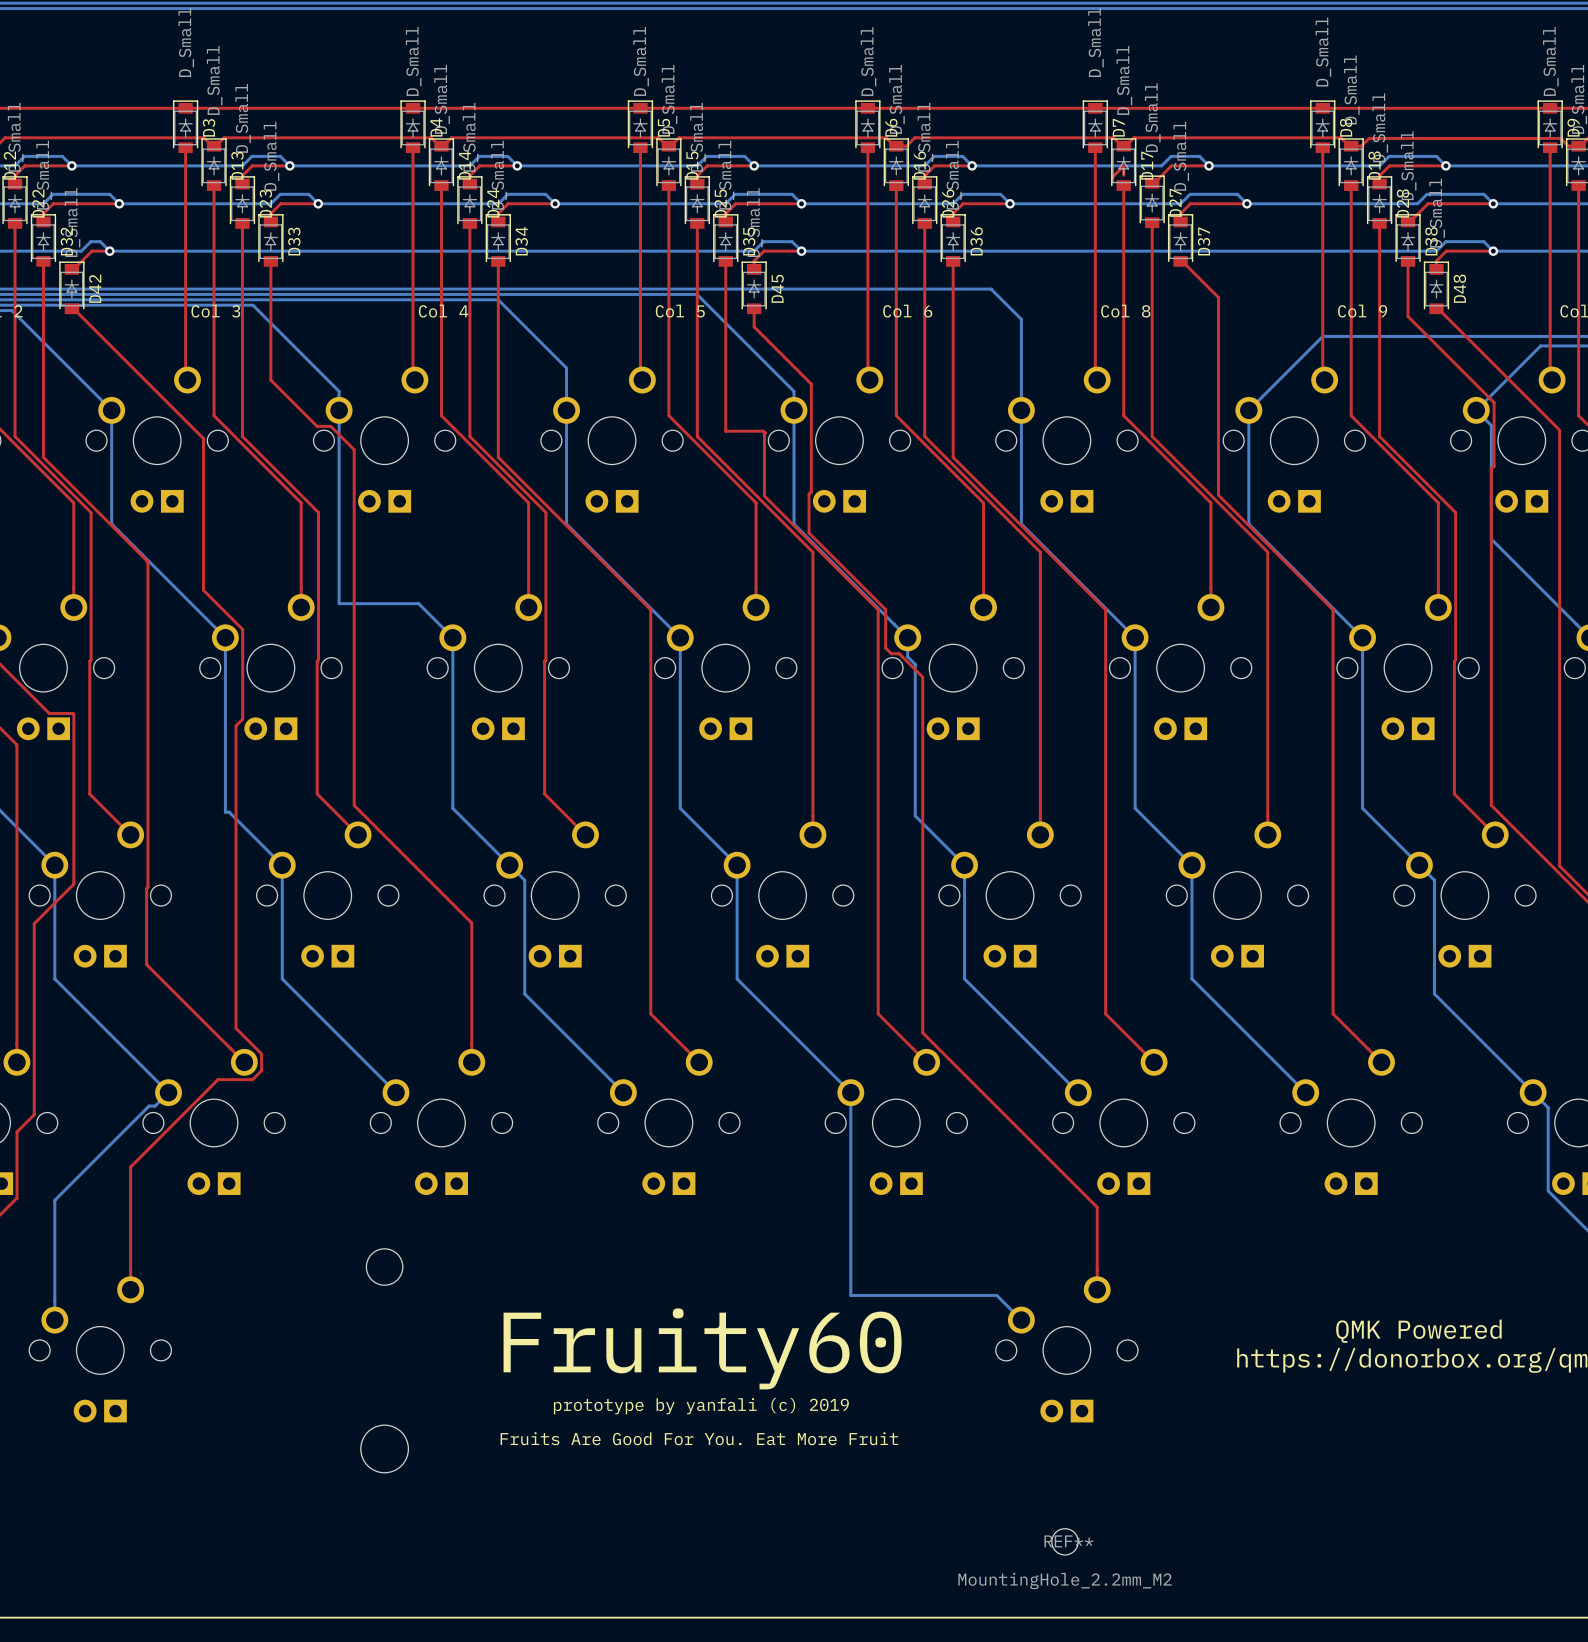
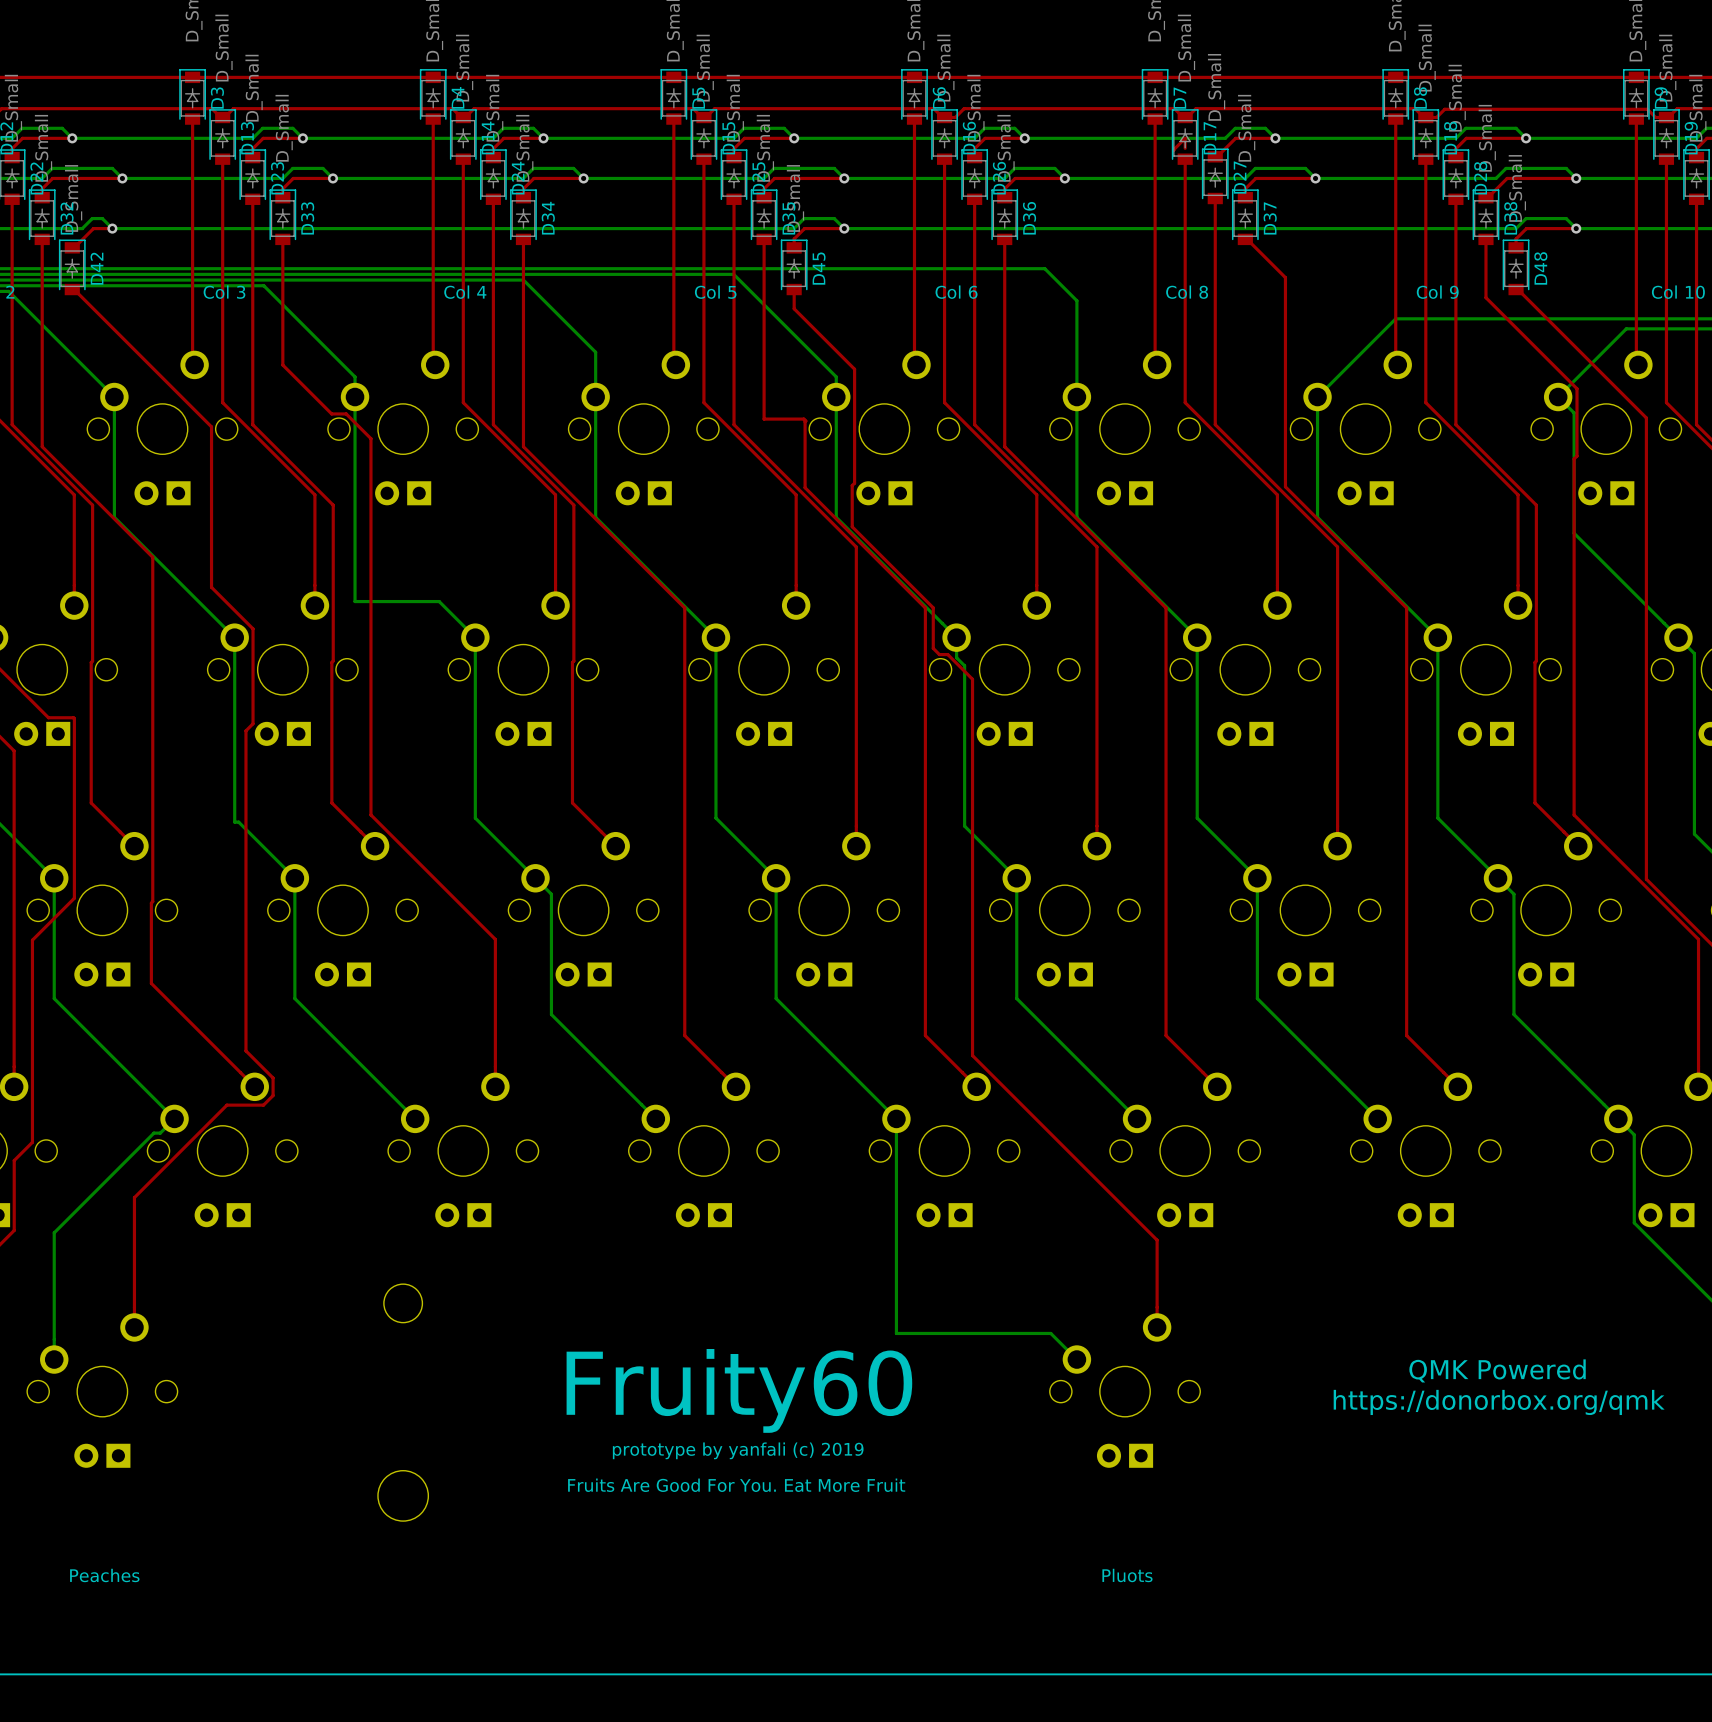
text: none -> Peaches (104, 1575)
text: none -> Pluots (1127, 1575)
REF**: MountingHole_2.2mm_M2 (1065, 1541) -> none

